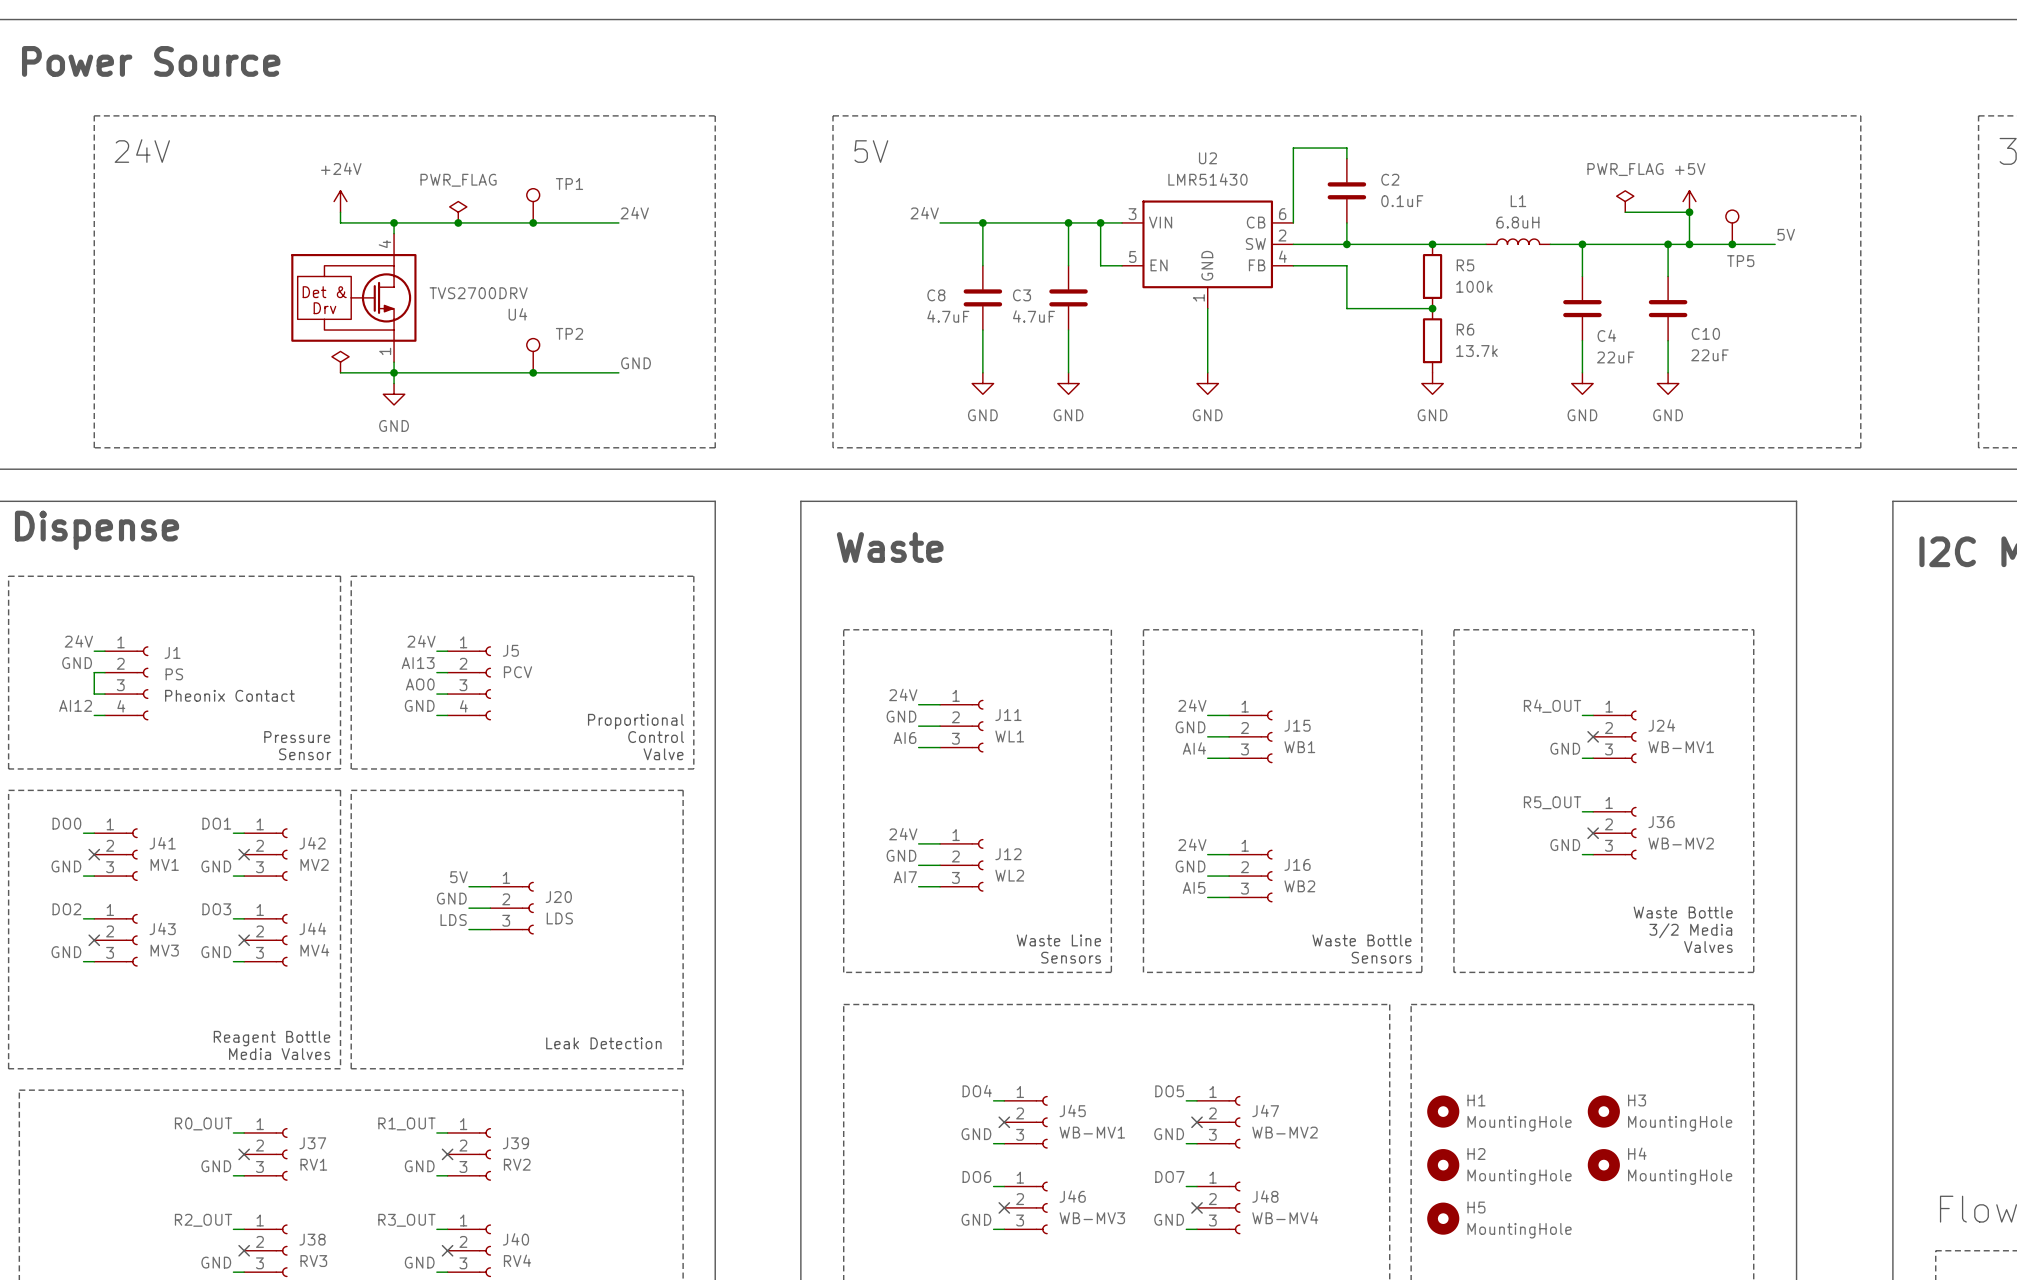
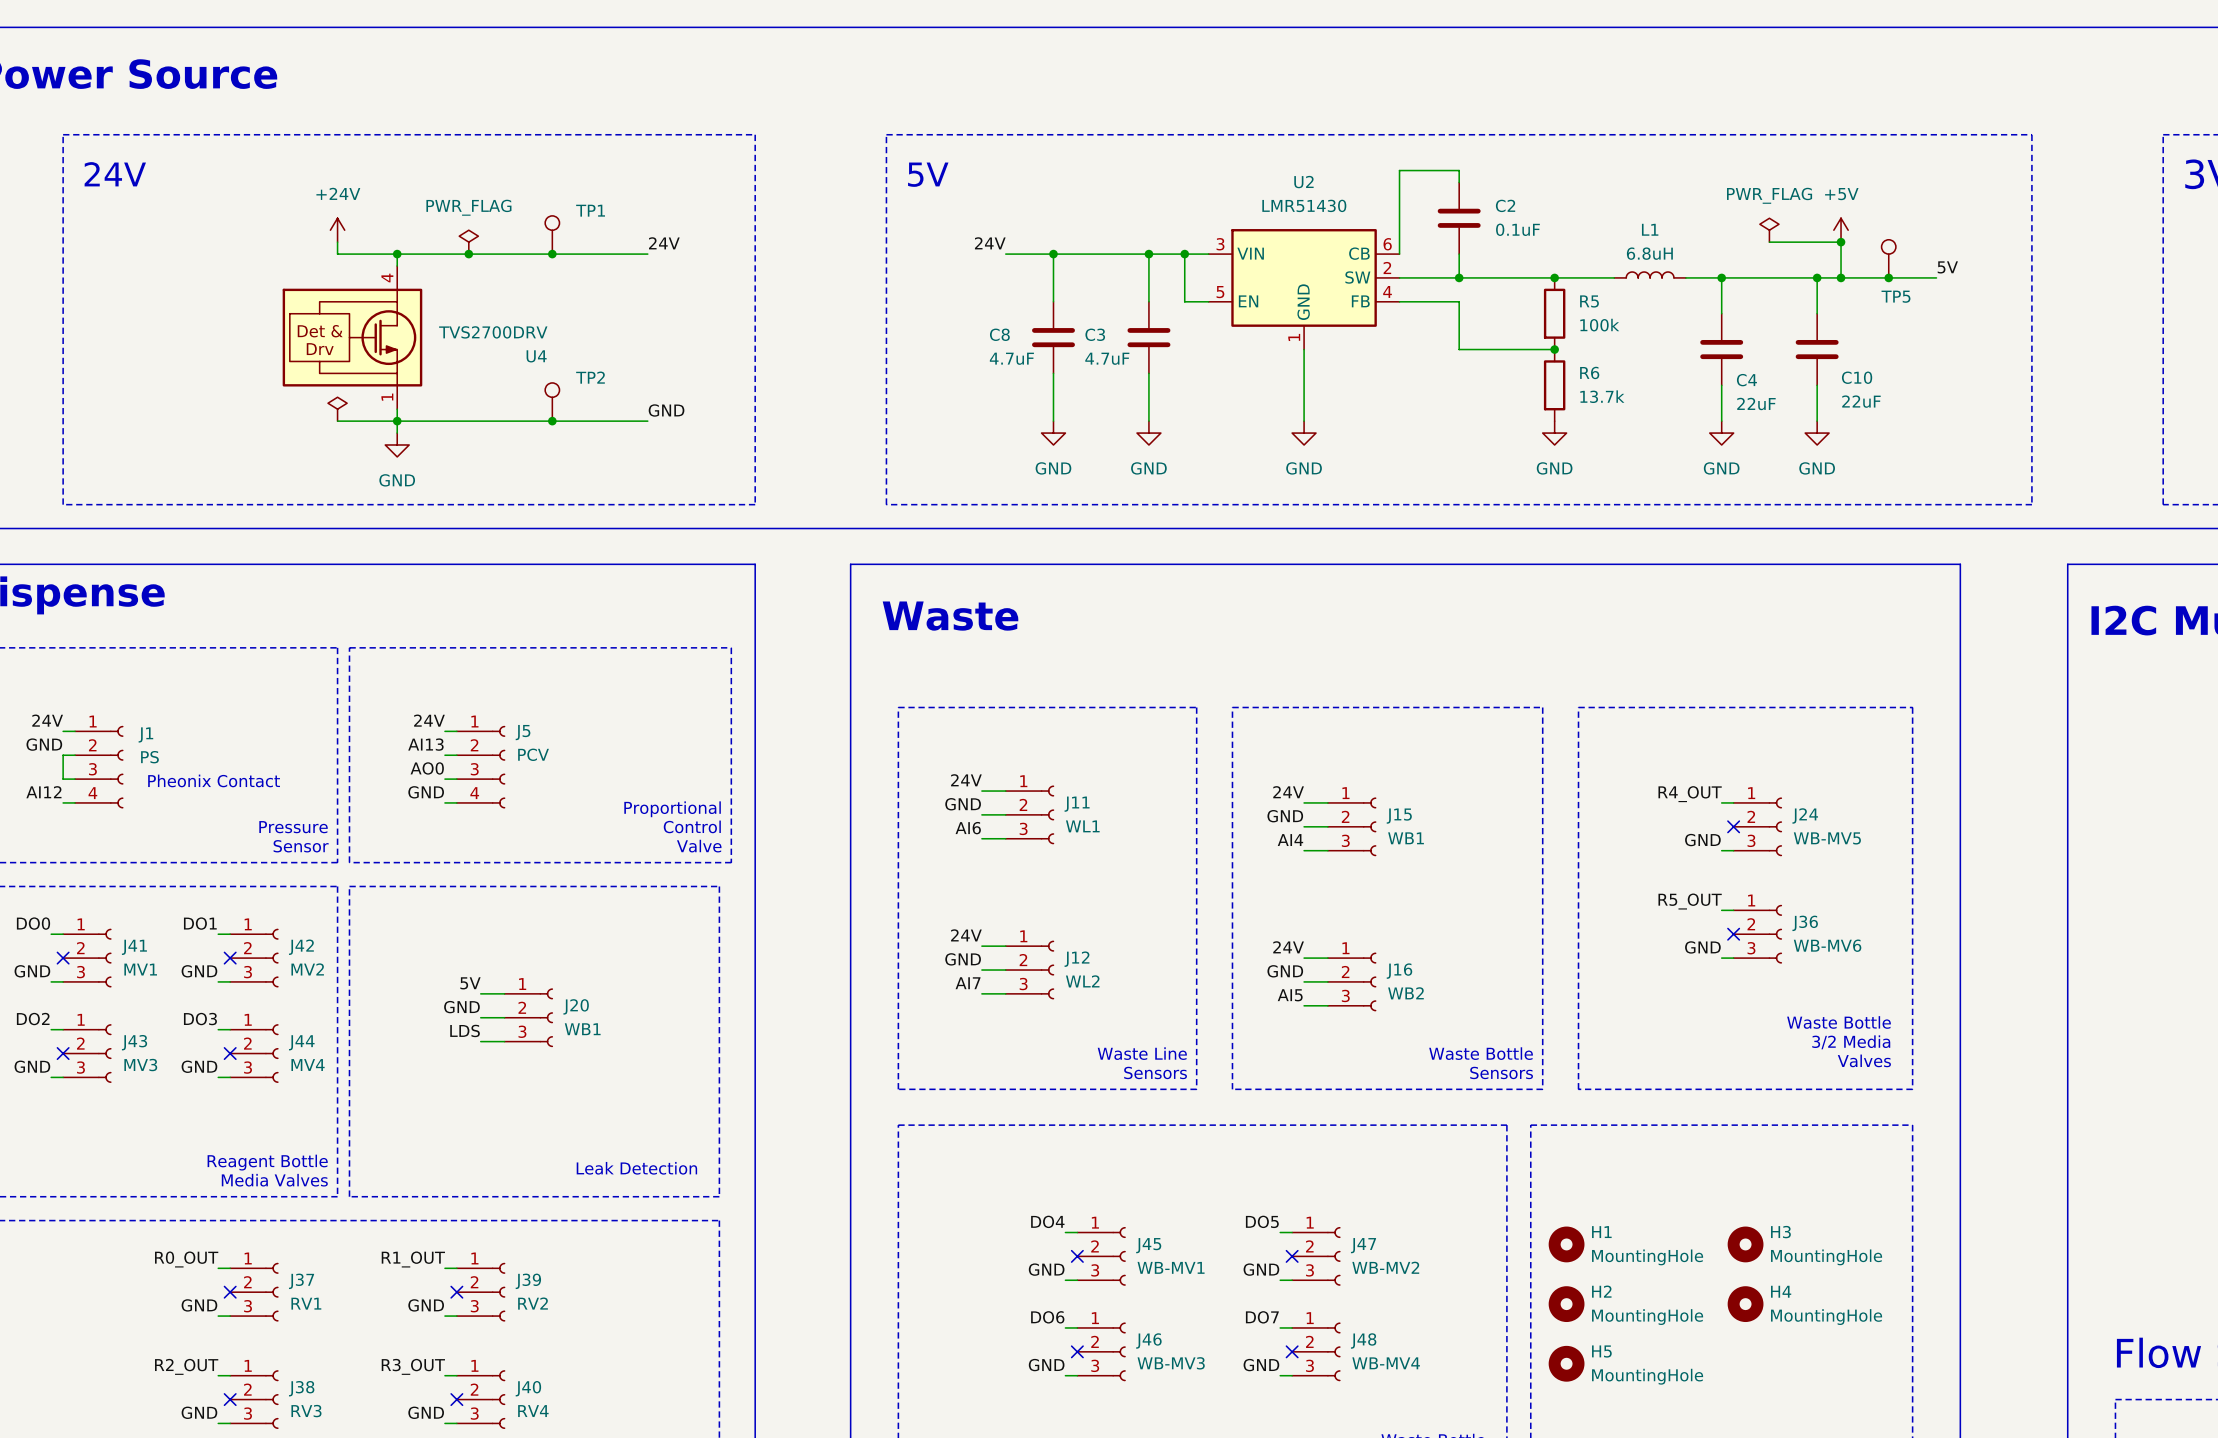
J24 value: WB-MV1 (1681, 747) -> WB-MV5 (1827, 838)
J36 value: WB-MV2 (1681, 843) -> WB-MV6 (1827, 945)
J20 value: LDS (559, 918) -> WB1 (582, 1029)

